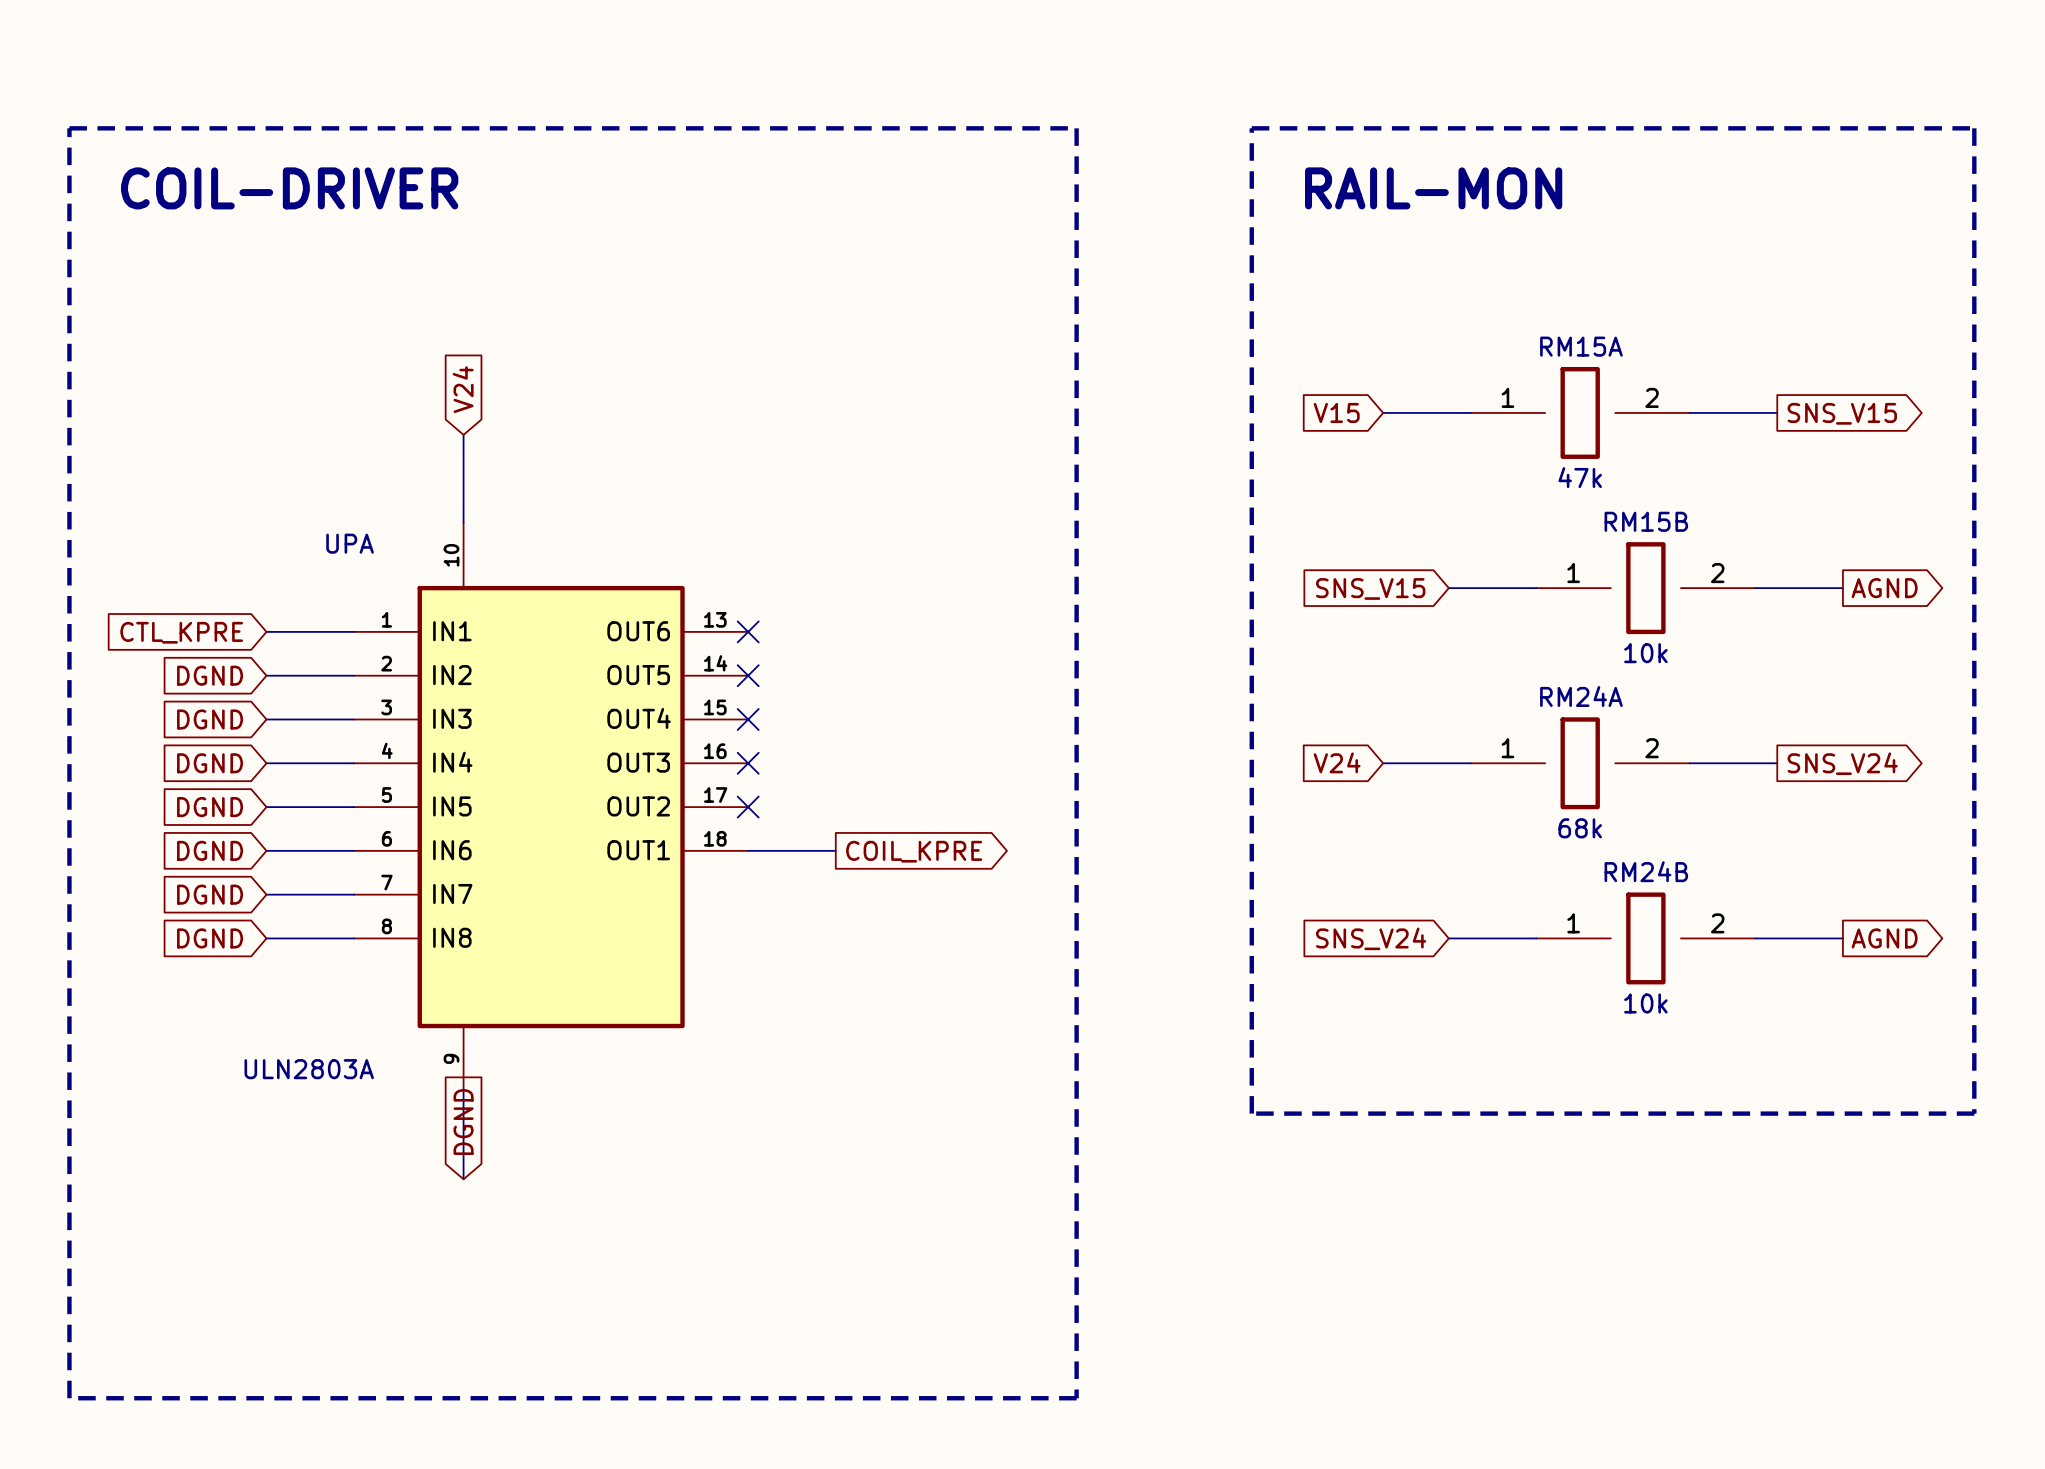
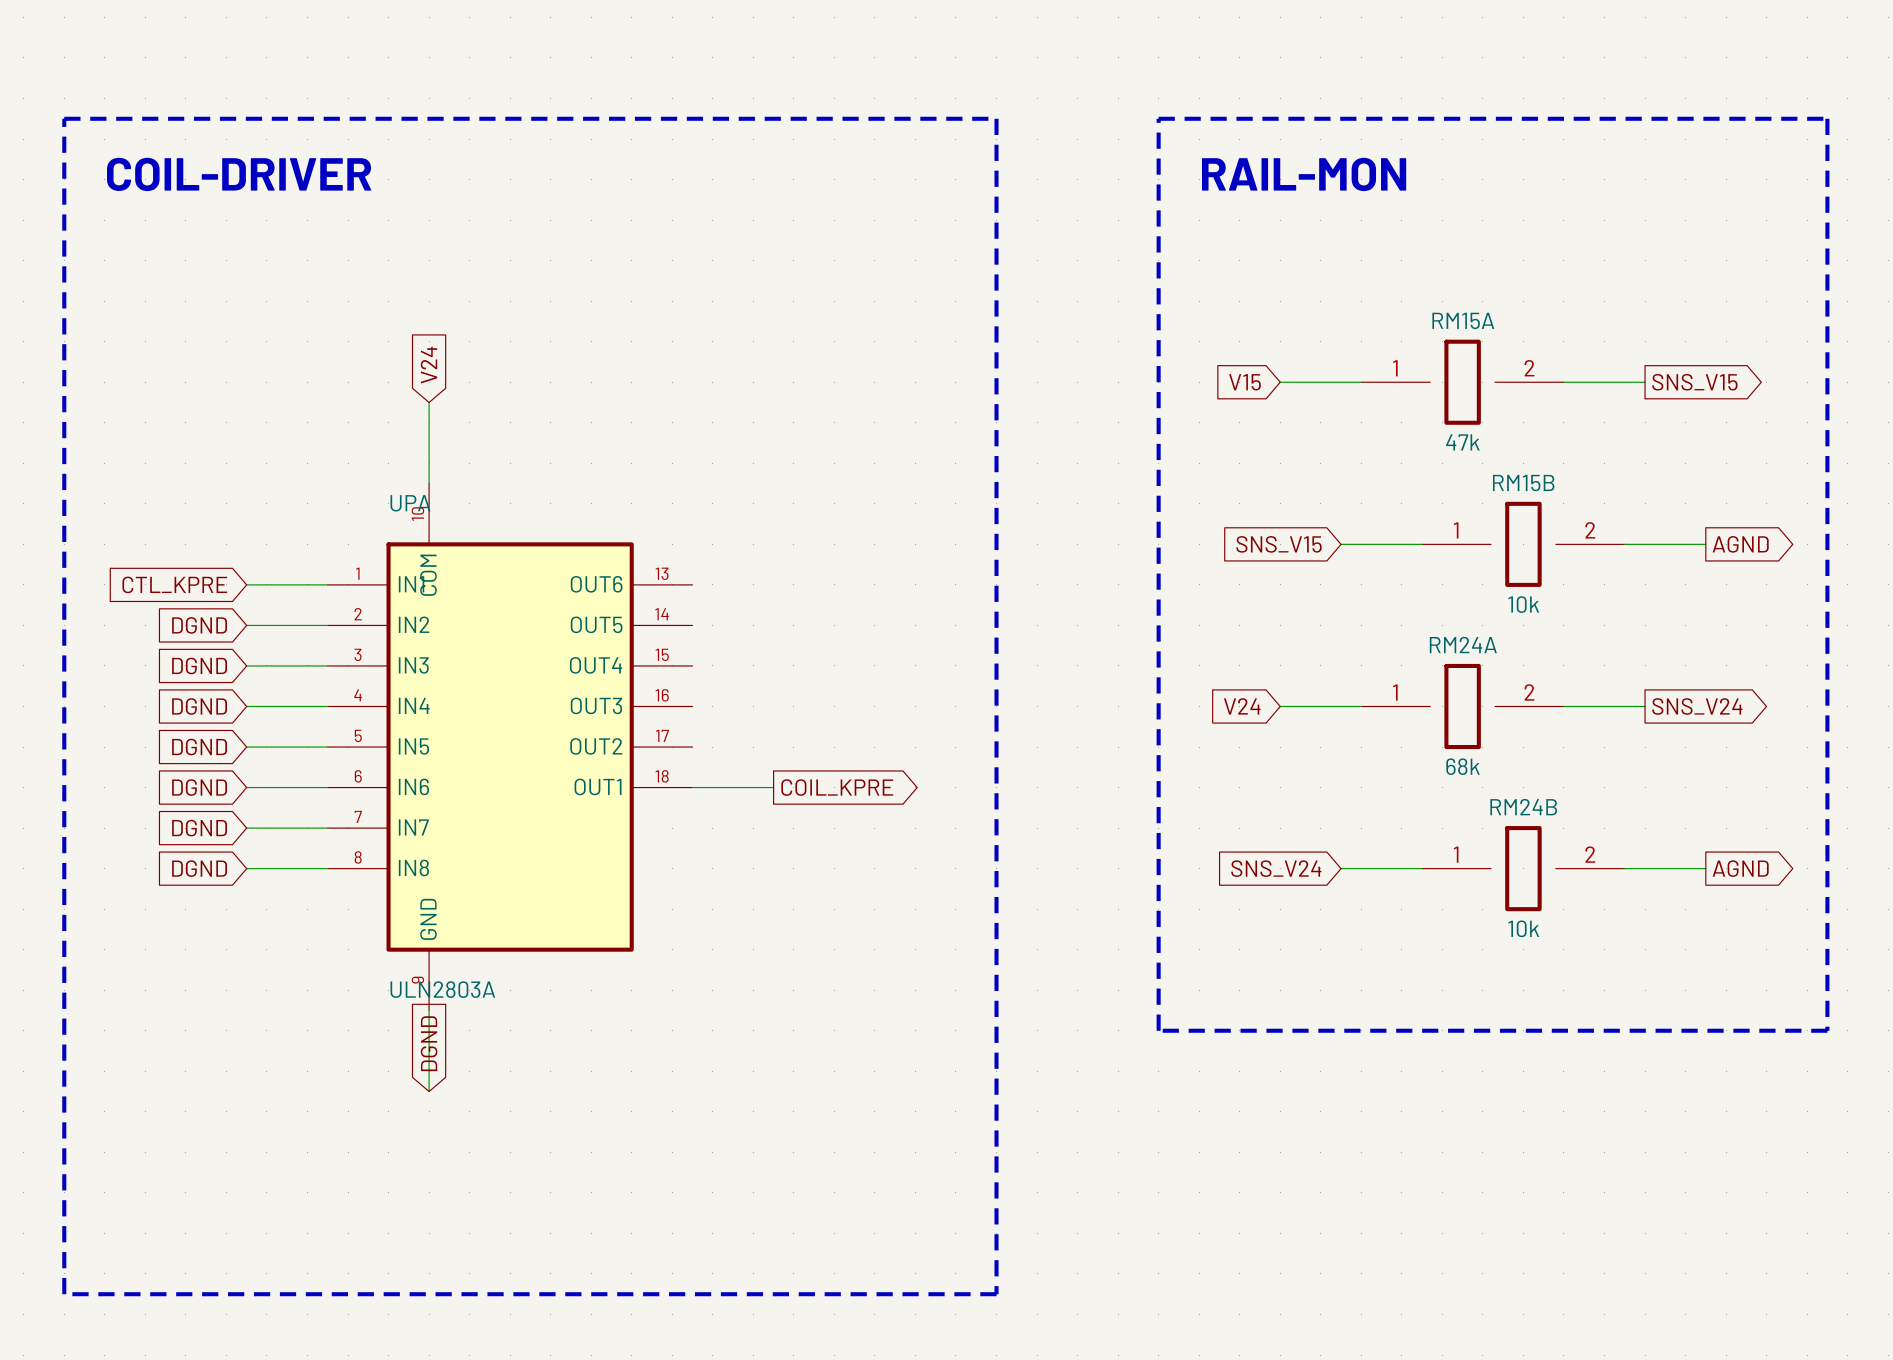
UPA name position: UPA (350, 543) -> UPA (410, 503)
UPA pin name: none -> COM (428, 575)
no-connect mark: (748, 631) -> none
no-connect mark: (748, 675) -> none
no-connect mark: (748, 719) -> none
no-connect mark: (748, 763) -> none
no-connect mark: (748, 807) -> none
UPA pin name: none -> GND (428, 919)
UPA value position: ULN2803A (309, 1069) -> ULN2803A (442, 989)

